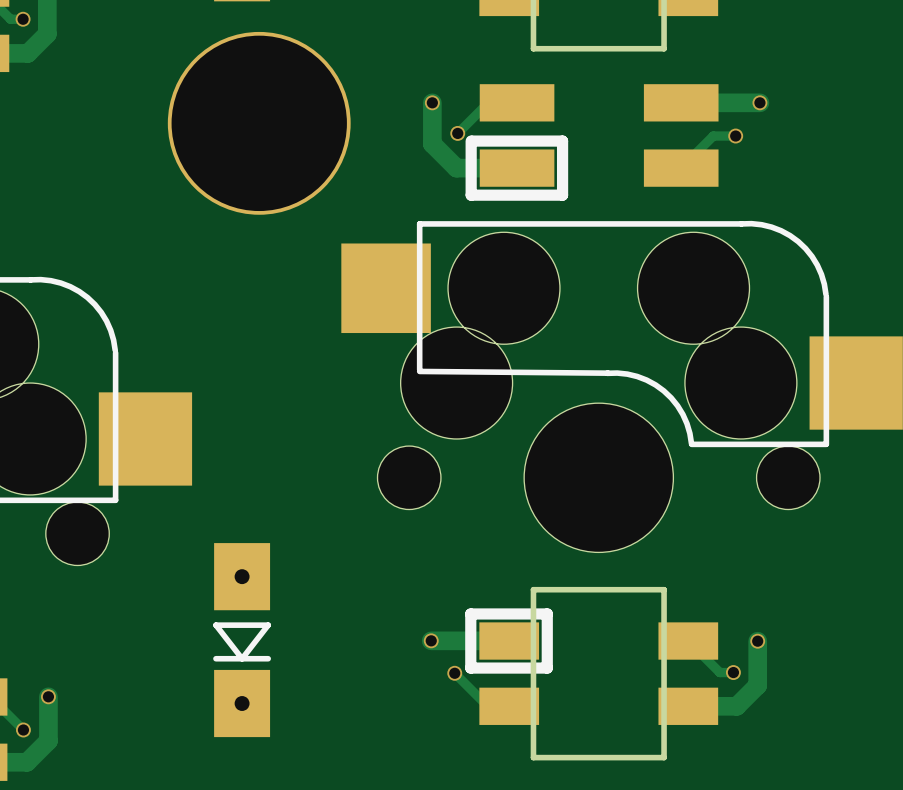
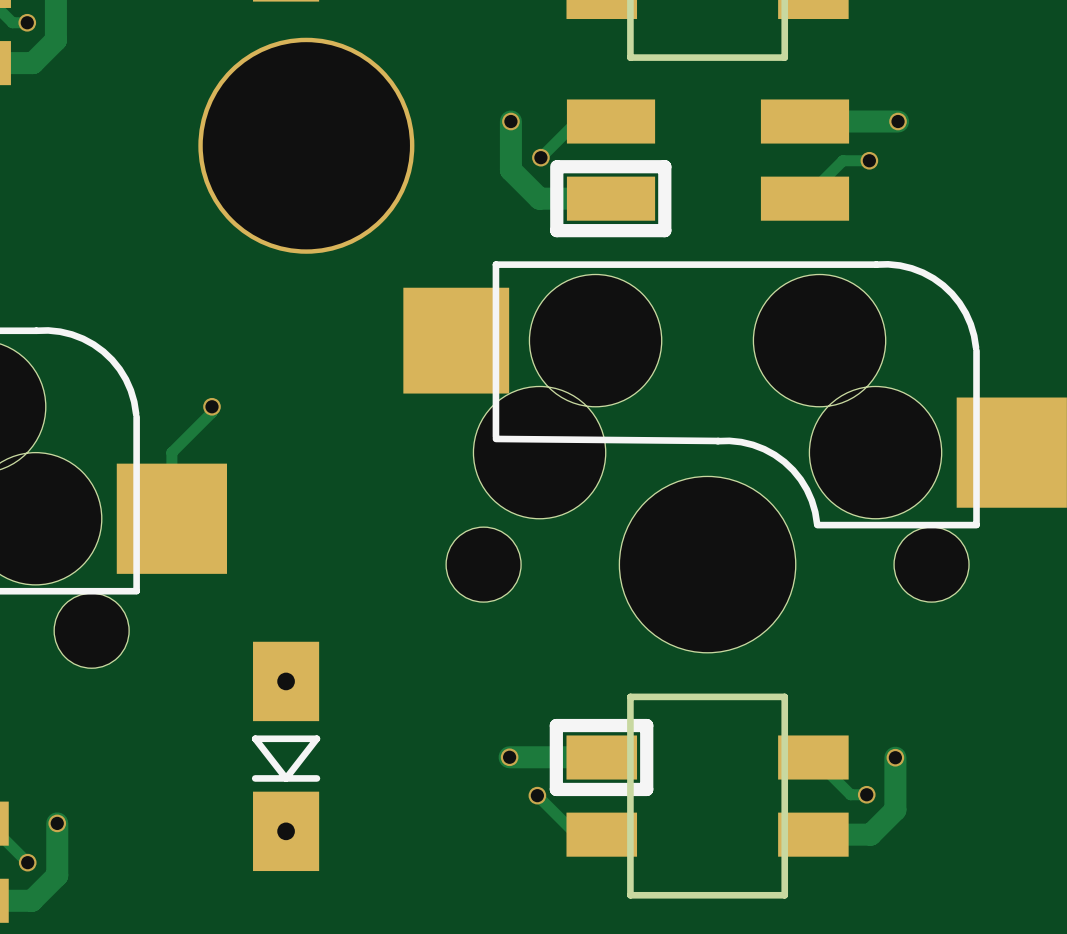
track: none -> (212, 406) (212, 412) (171, 452) (171, 518)
via: none -> (212, 406)

